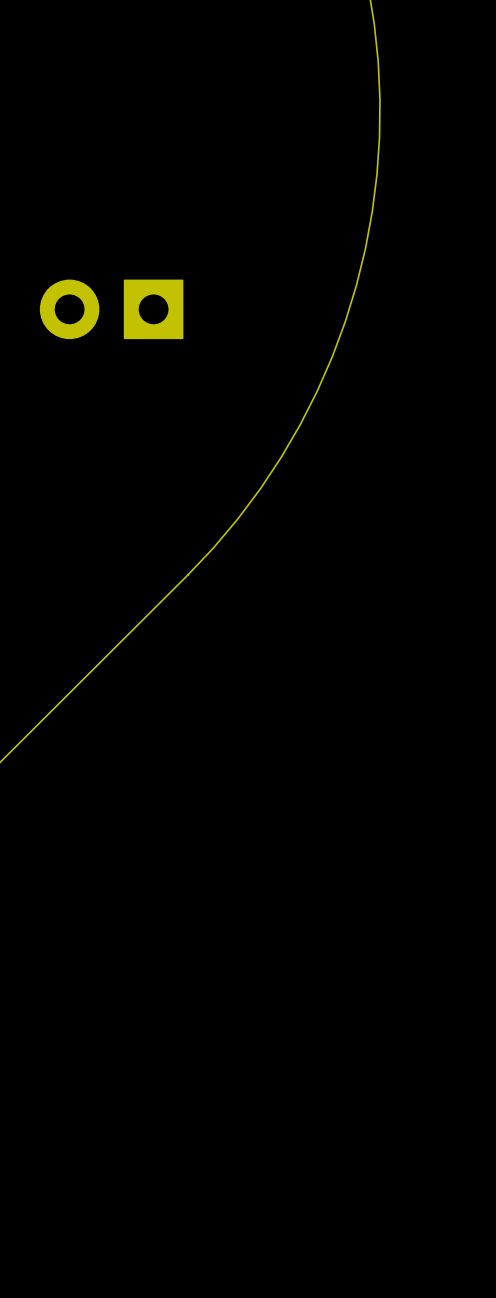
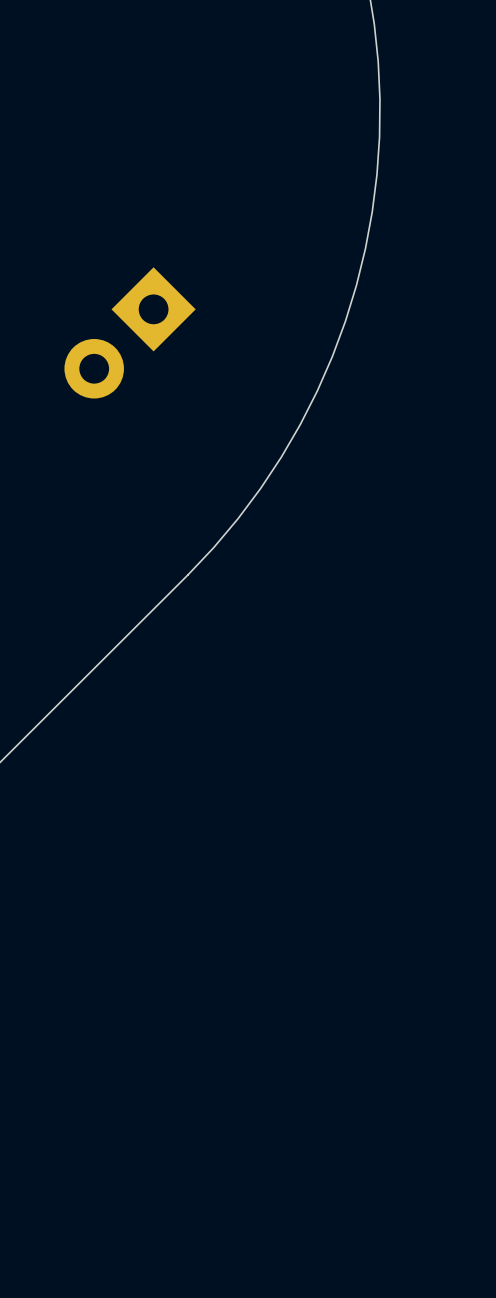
part rotation: 0° (111, 309) -> 45° counterclockwise (130, 332)

